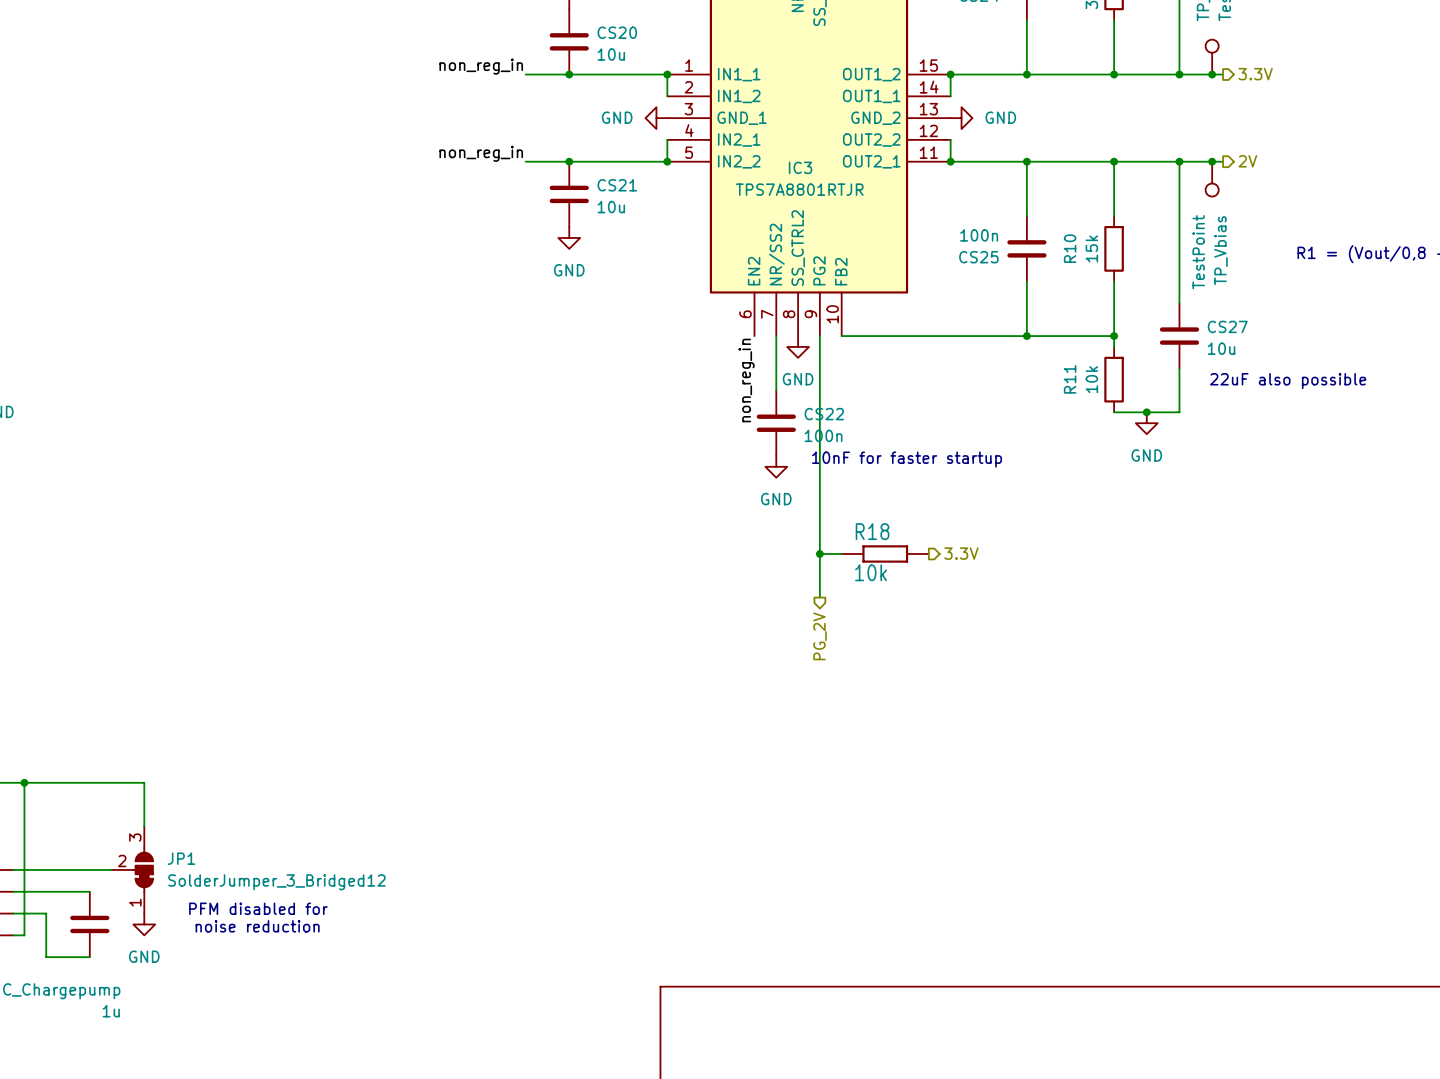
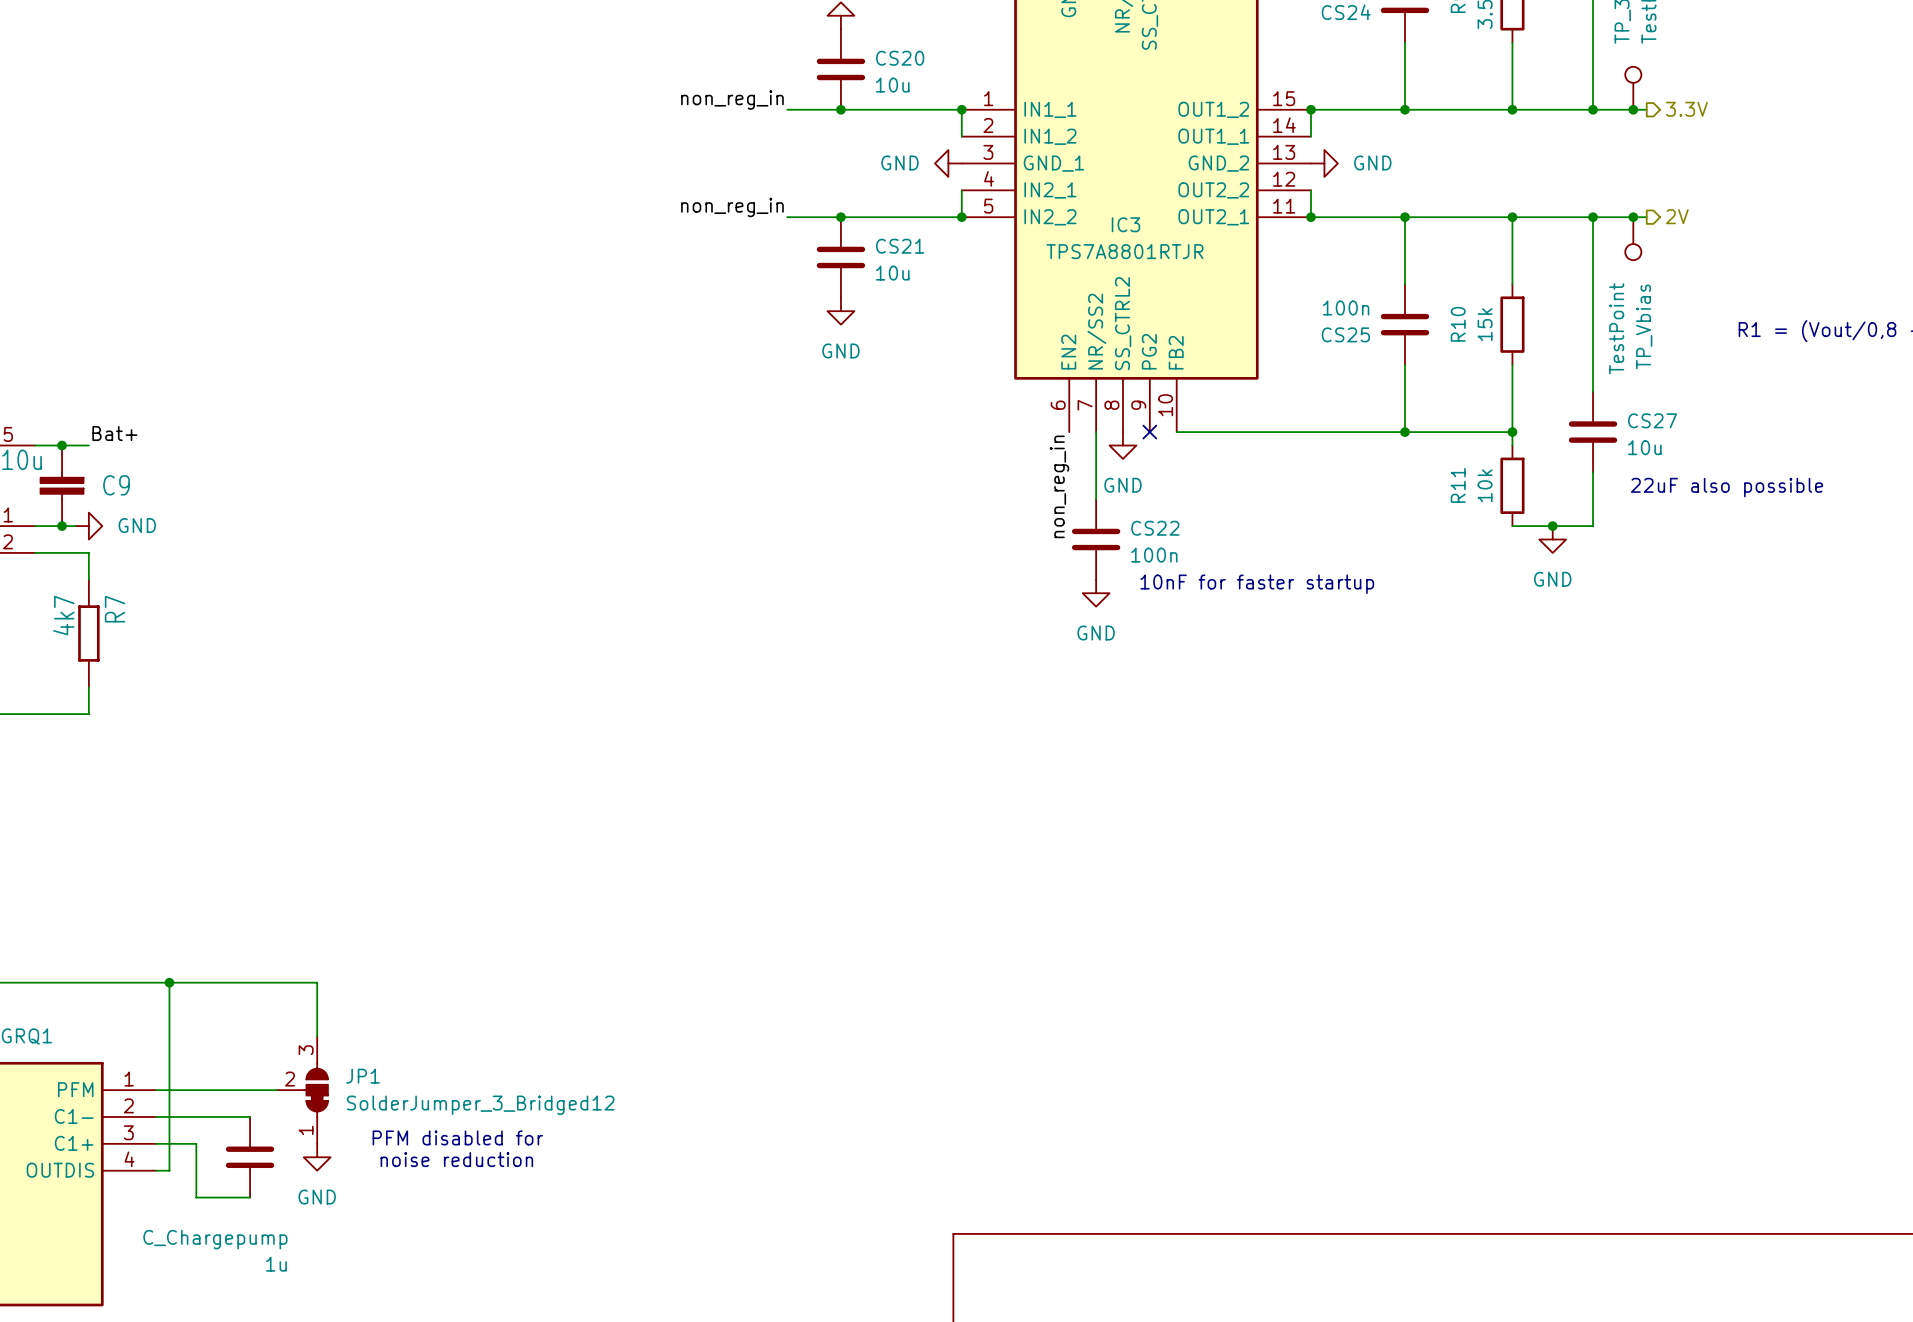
wire: (819, 336) (819, 597) -> none
no-connect mark: none -> (1149, 432)
wire: (819, 553) (841, 553) -> none
junction: (819, 553) -> none
R18: 10k (885, 553) -> none
hierarchical label: 3.3V (961, 553) -> none
hierarchical label: PG_2V (819, 636) -> none

